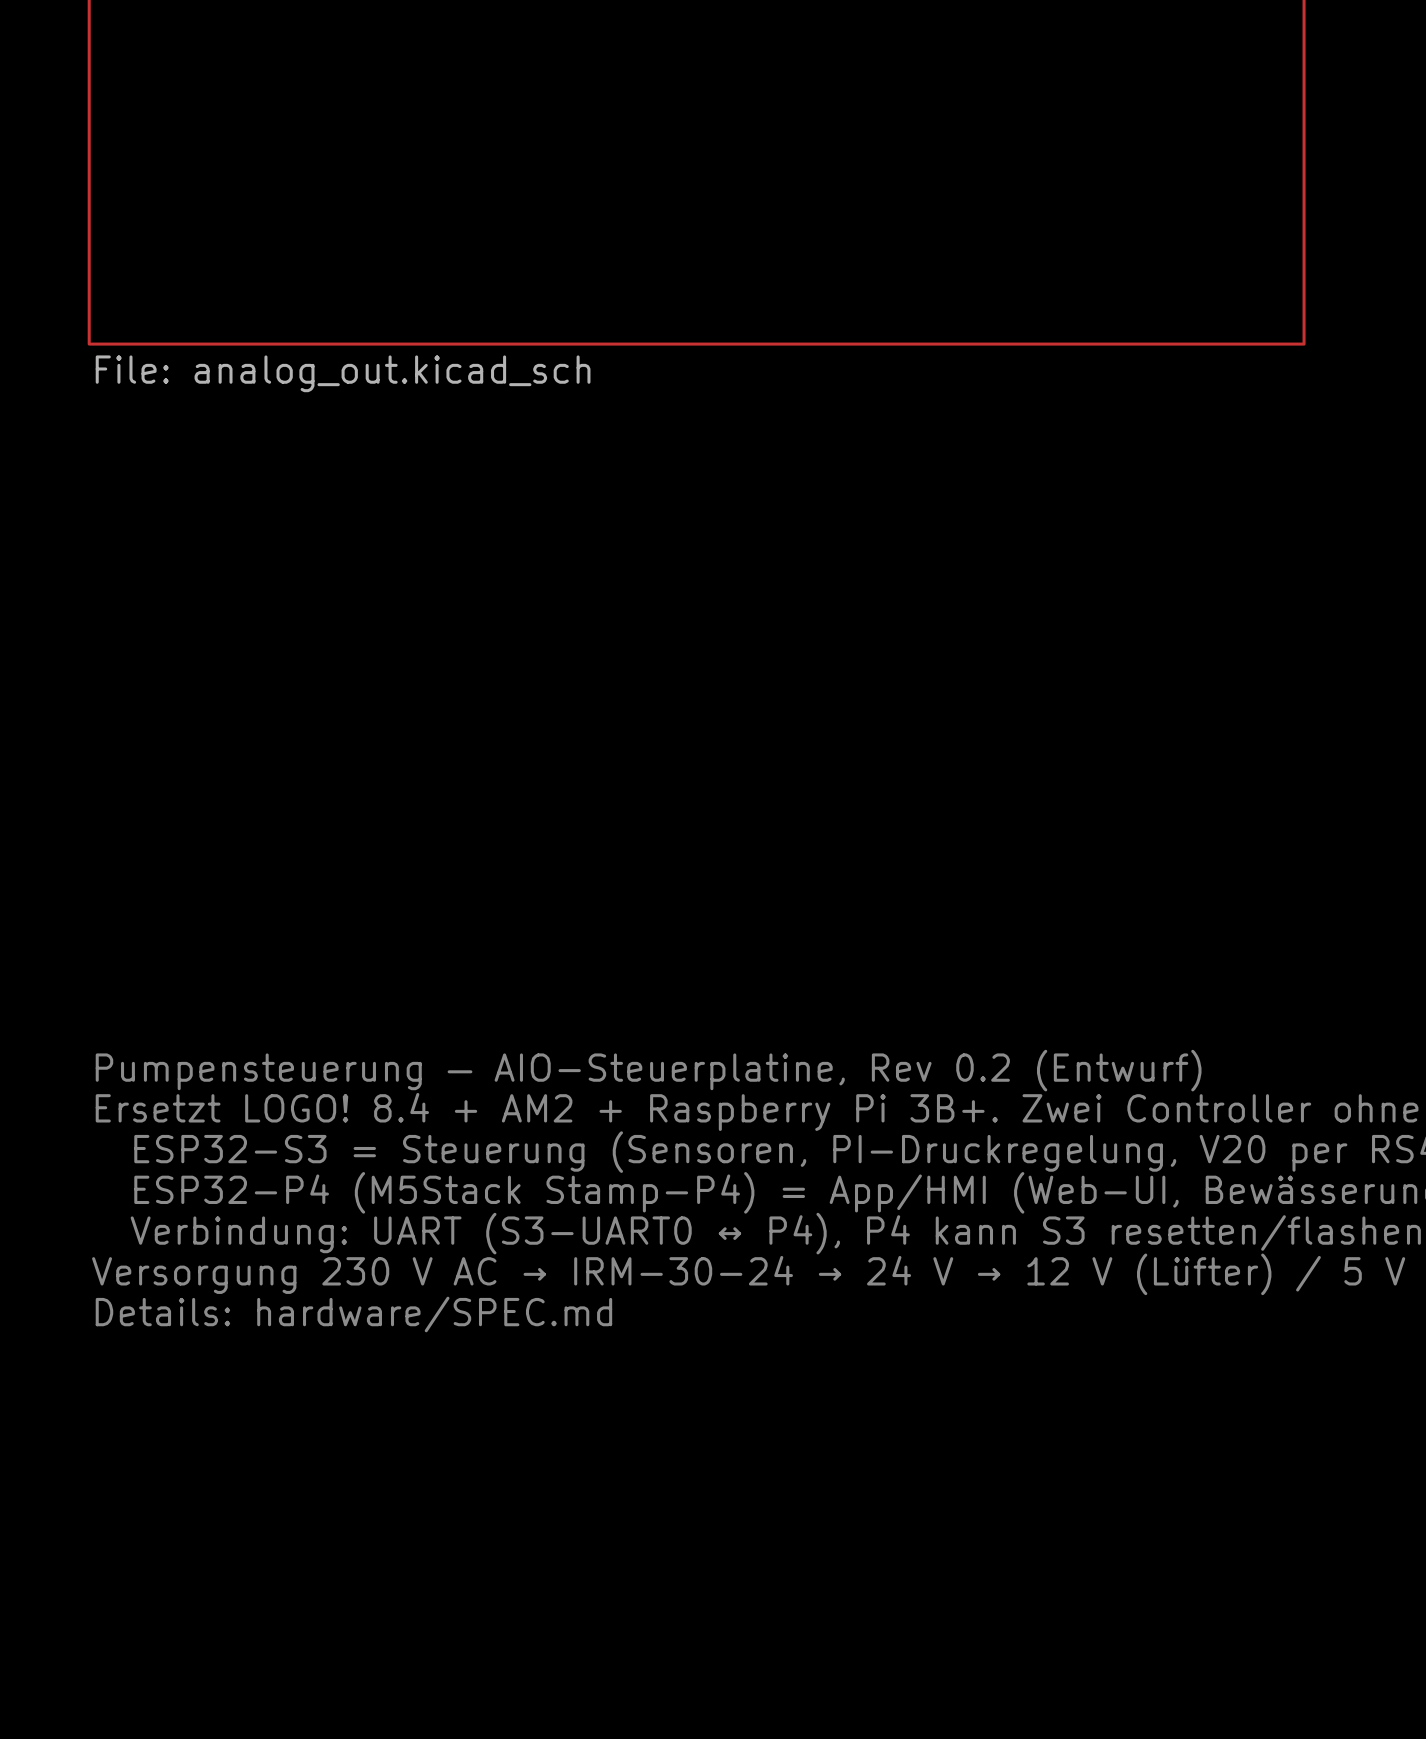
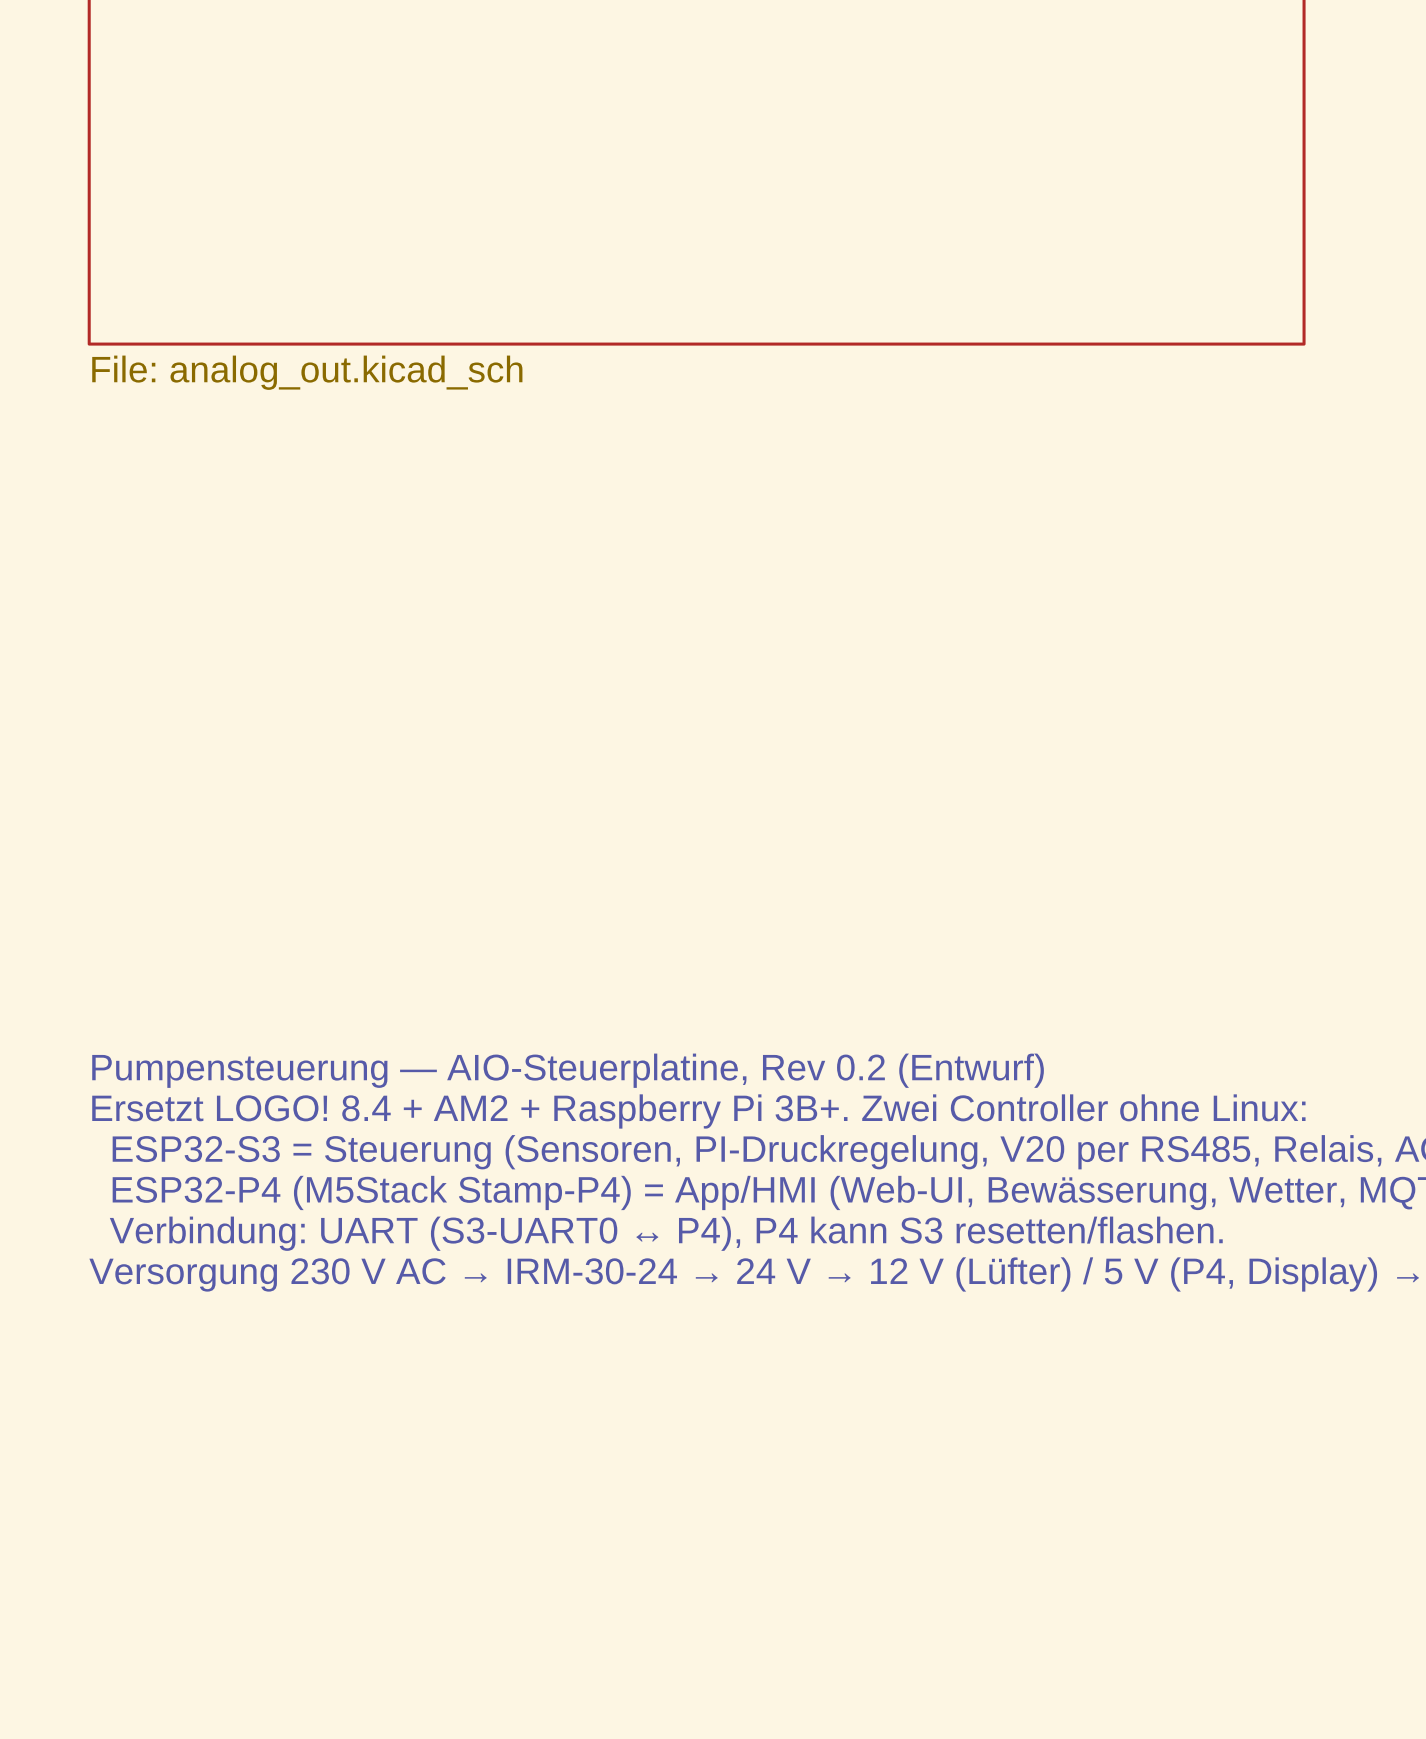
text: Details: hardware/SPEC.md (353, 1314) -> none

